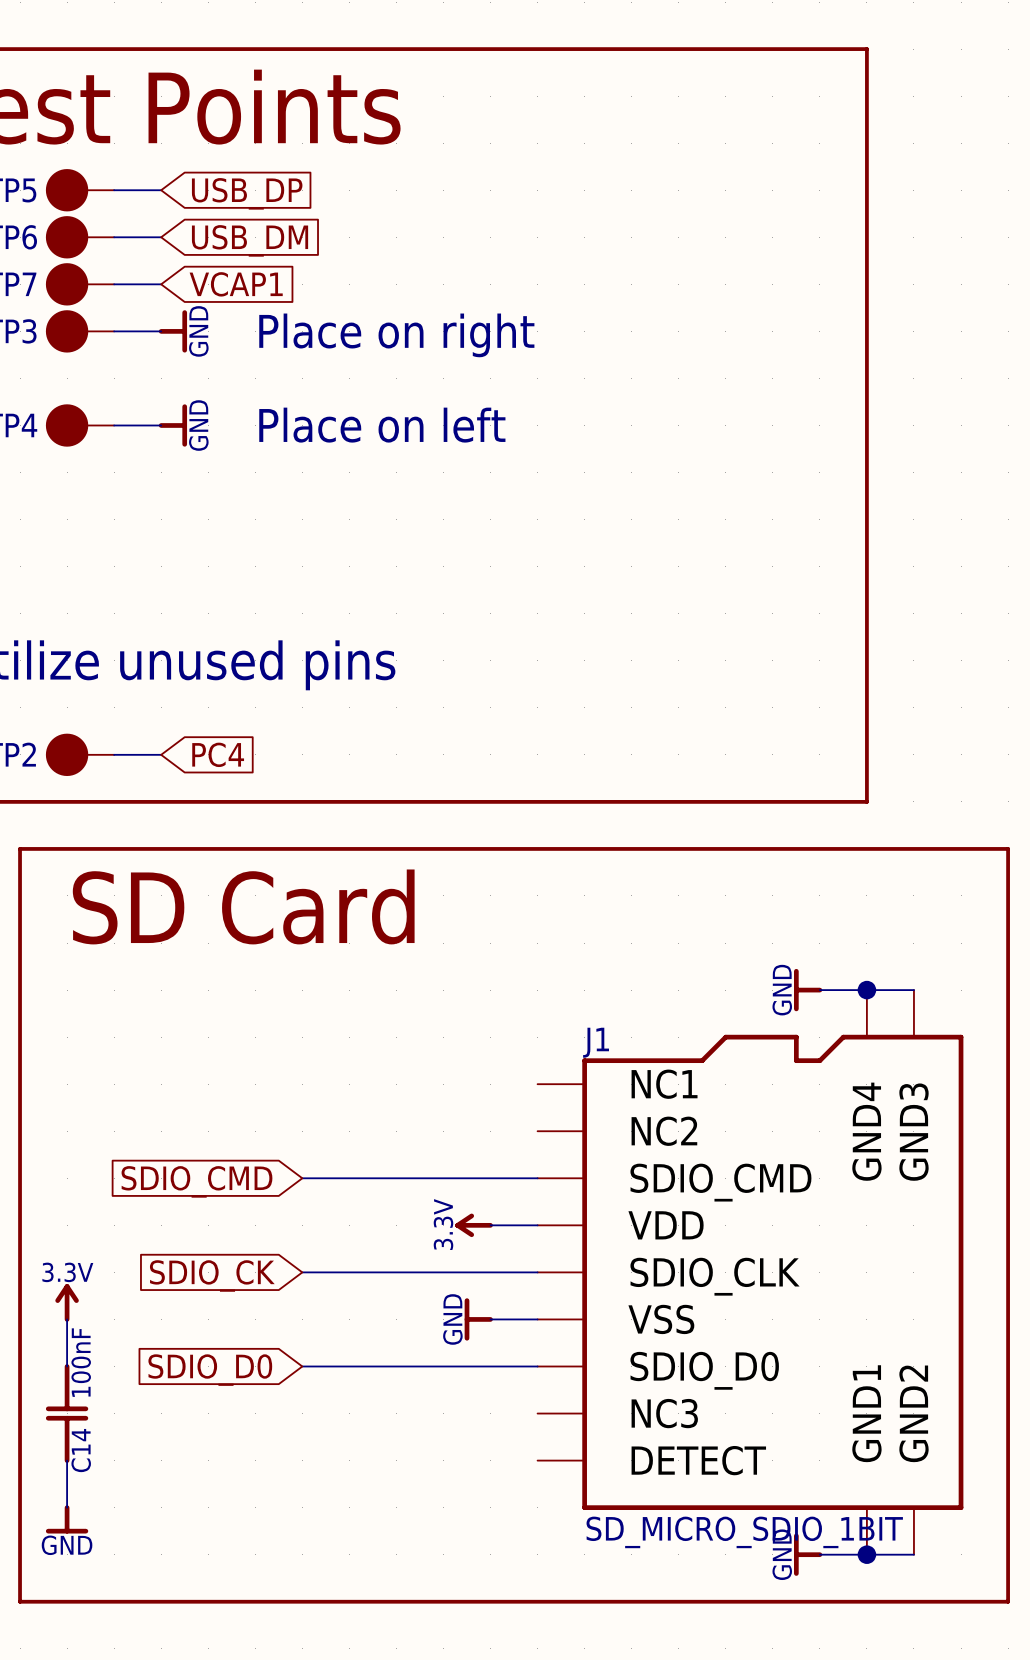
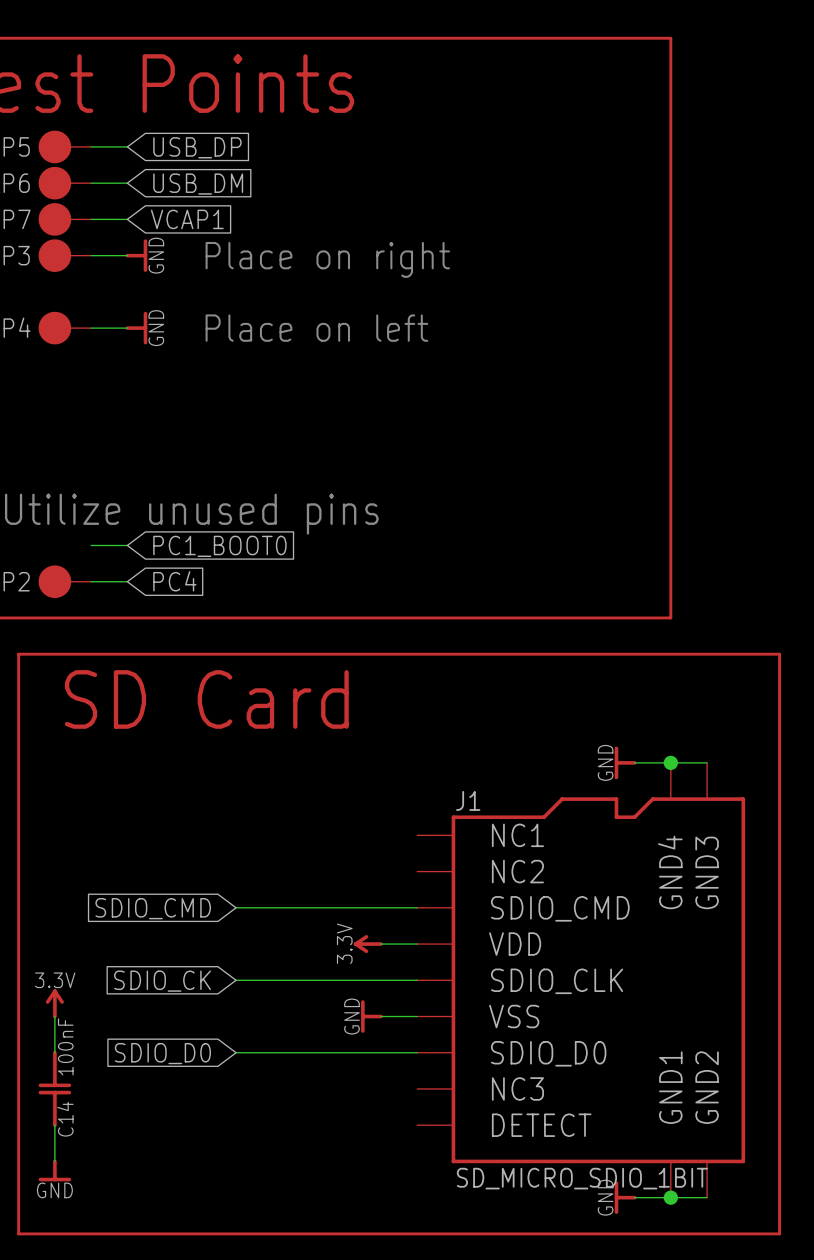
wire: none -> (91, 545) (127, 545)
global label: none -> PC1_BOOT0 (219, 546)

